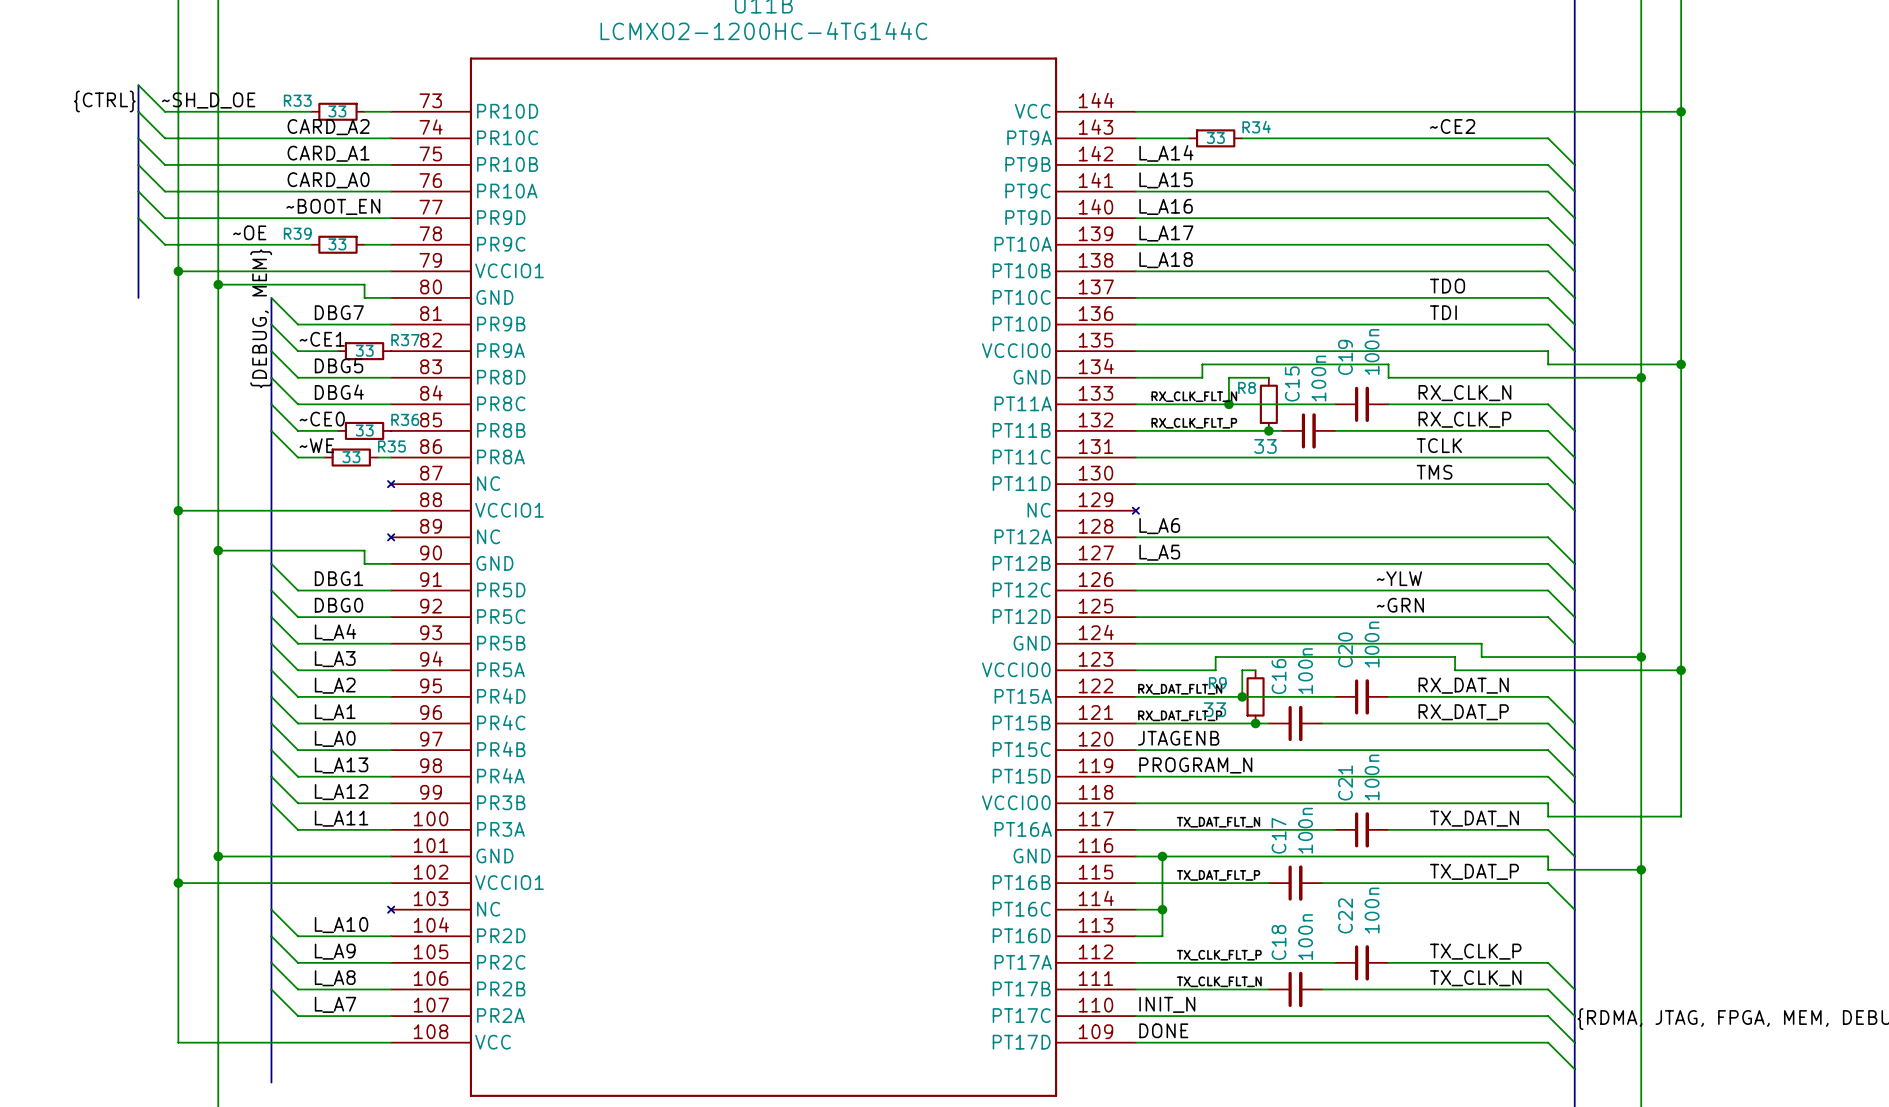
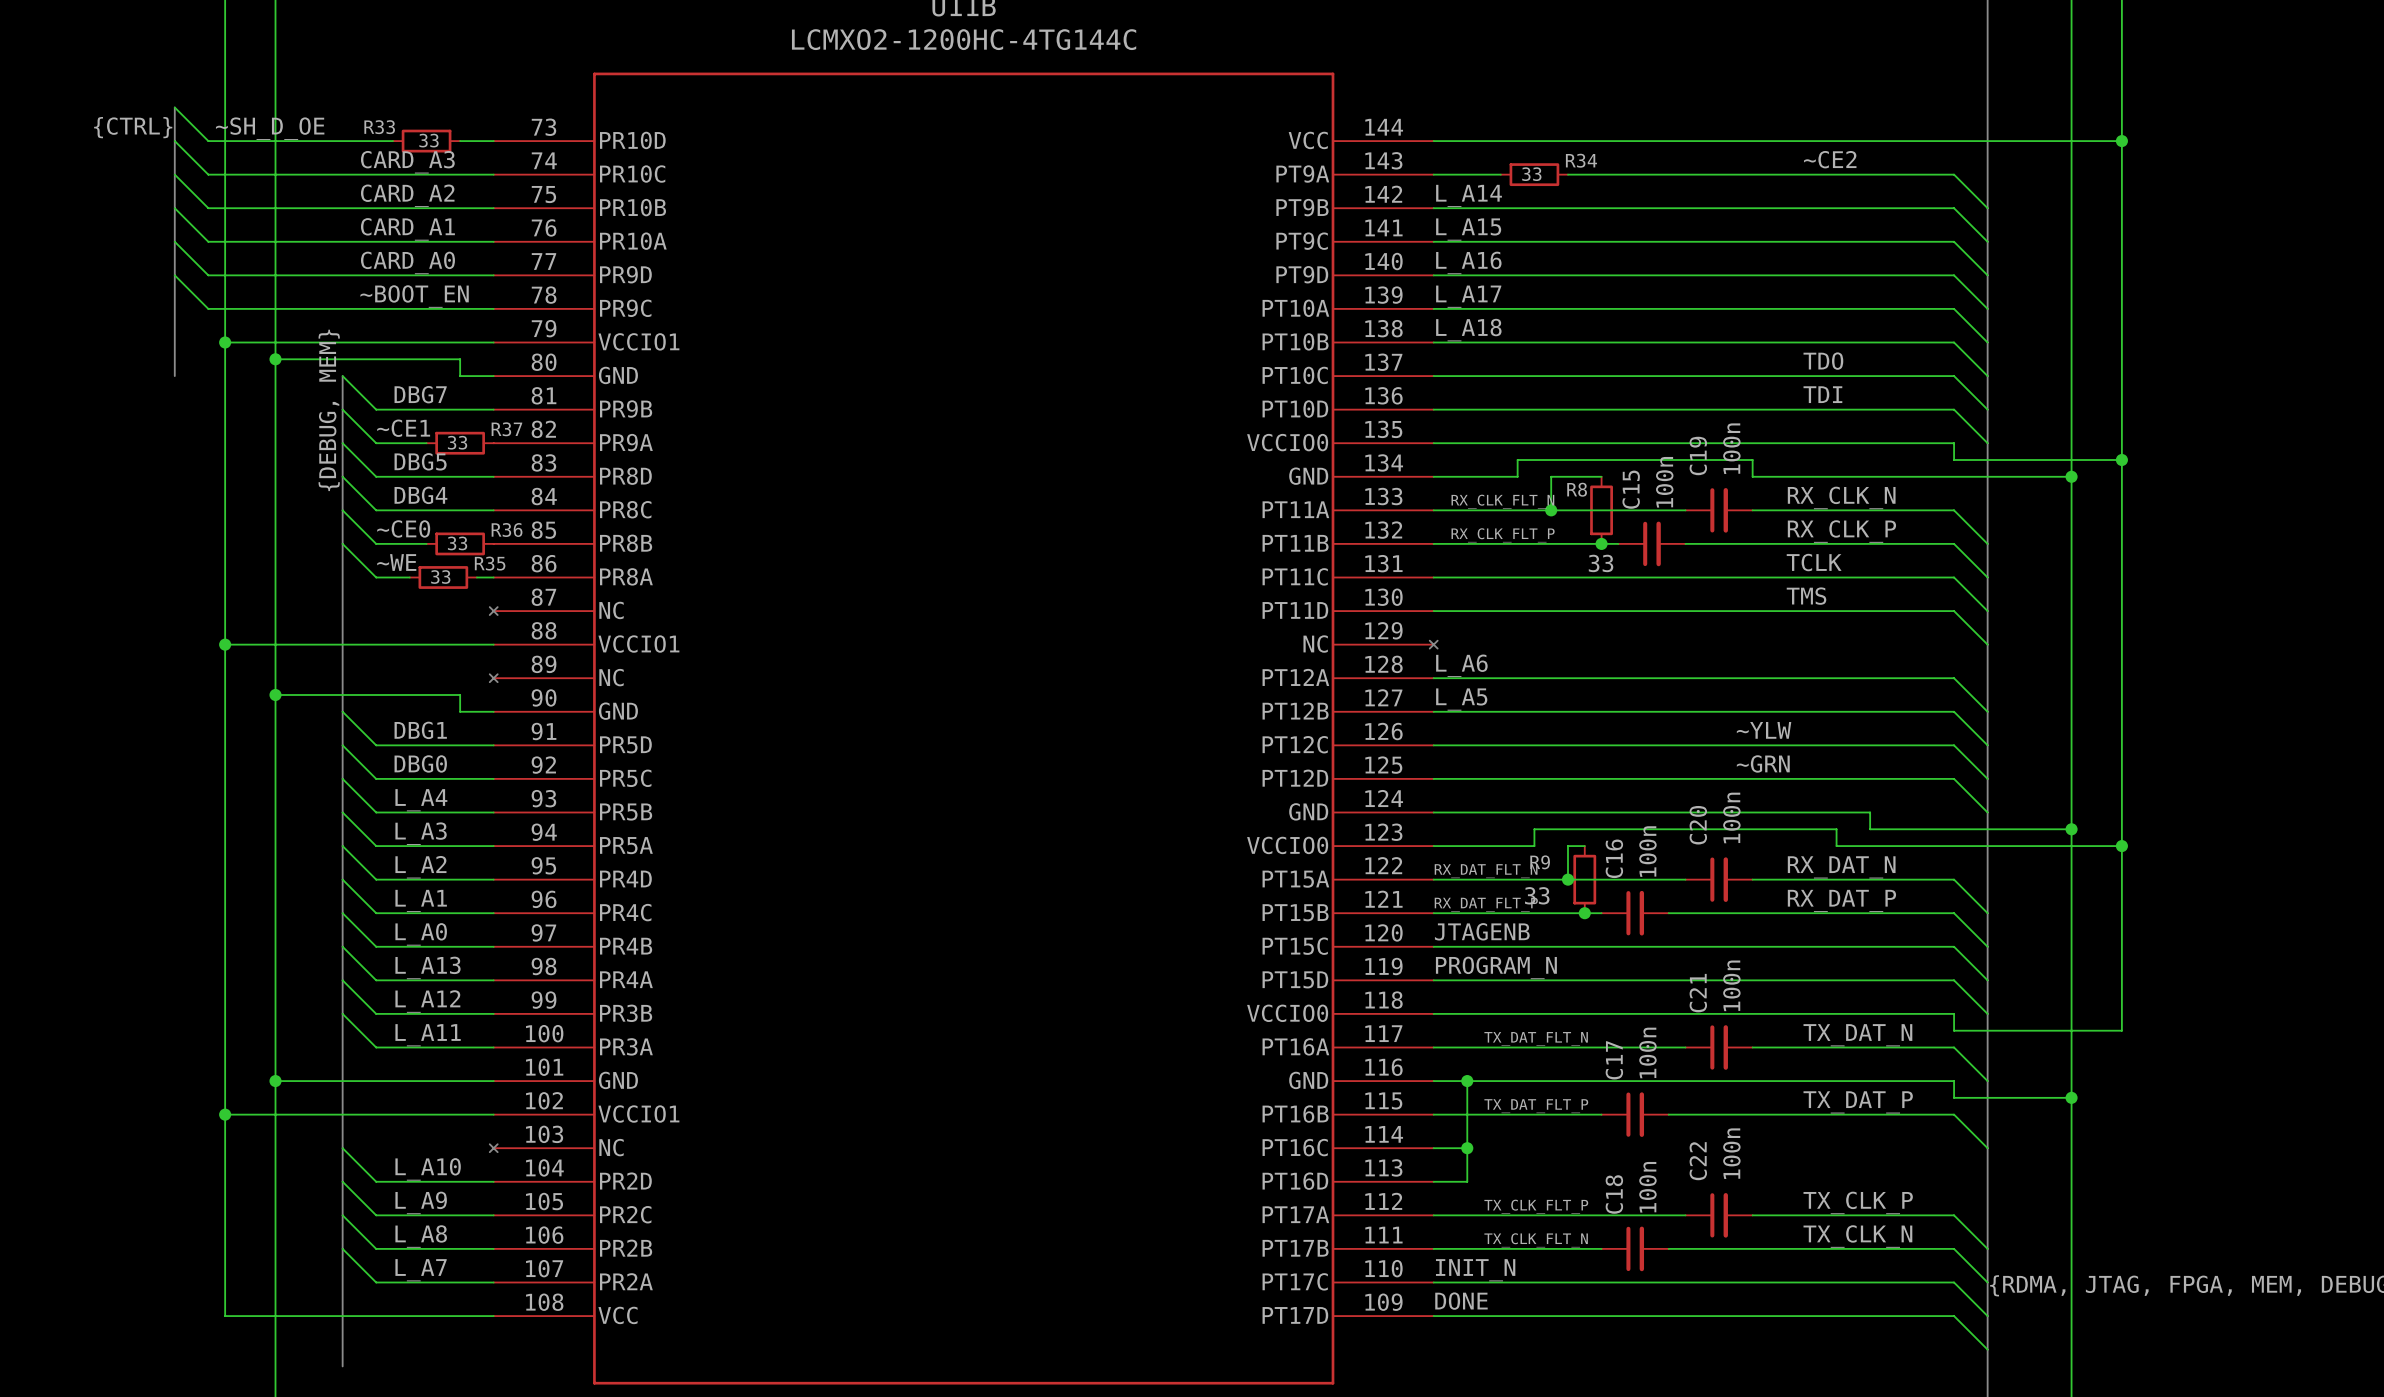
label: CARD_A2 (328, 127) -> CARD_A3 (407, 162)
label: CARD_A1 (328, 153) -> CARD_A2 (407, 195)
label: CARD_A0 (328, 180) -> CARD_A1 (407, 229)
label: ~BOOT_EN (333, 206) -> CARD_A0 (407, 262)
label: ~OE (249, 232) -> none
label: none -> ~BOOT_EN (414, 296)
wire: none -> (393, 308) (460, 308)
R39: 33 (337, 244) -> none

